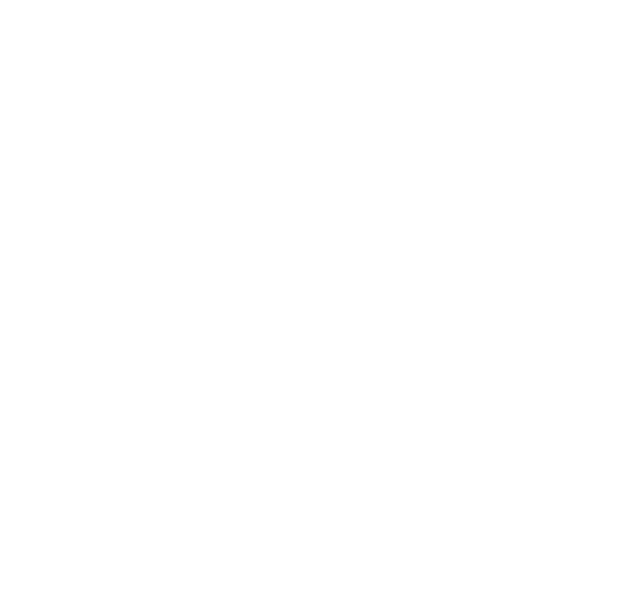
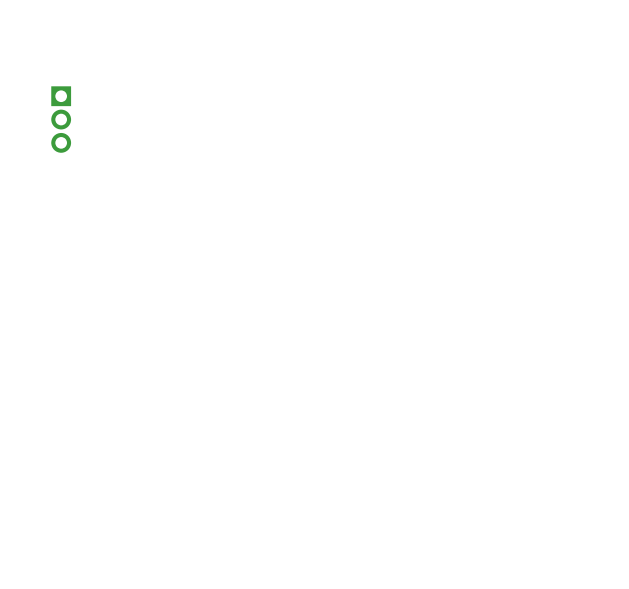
part: none -> (61, 119)

